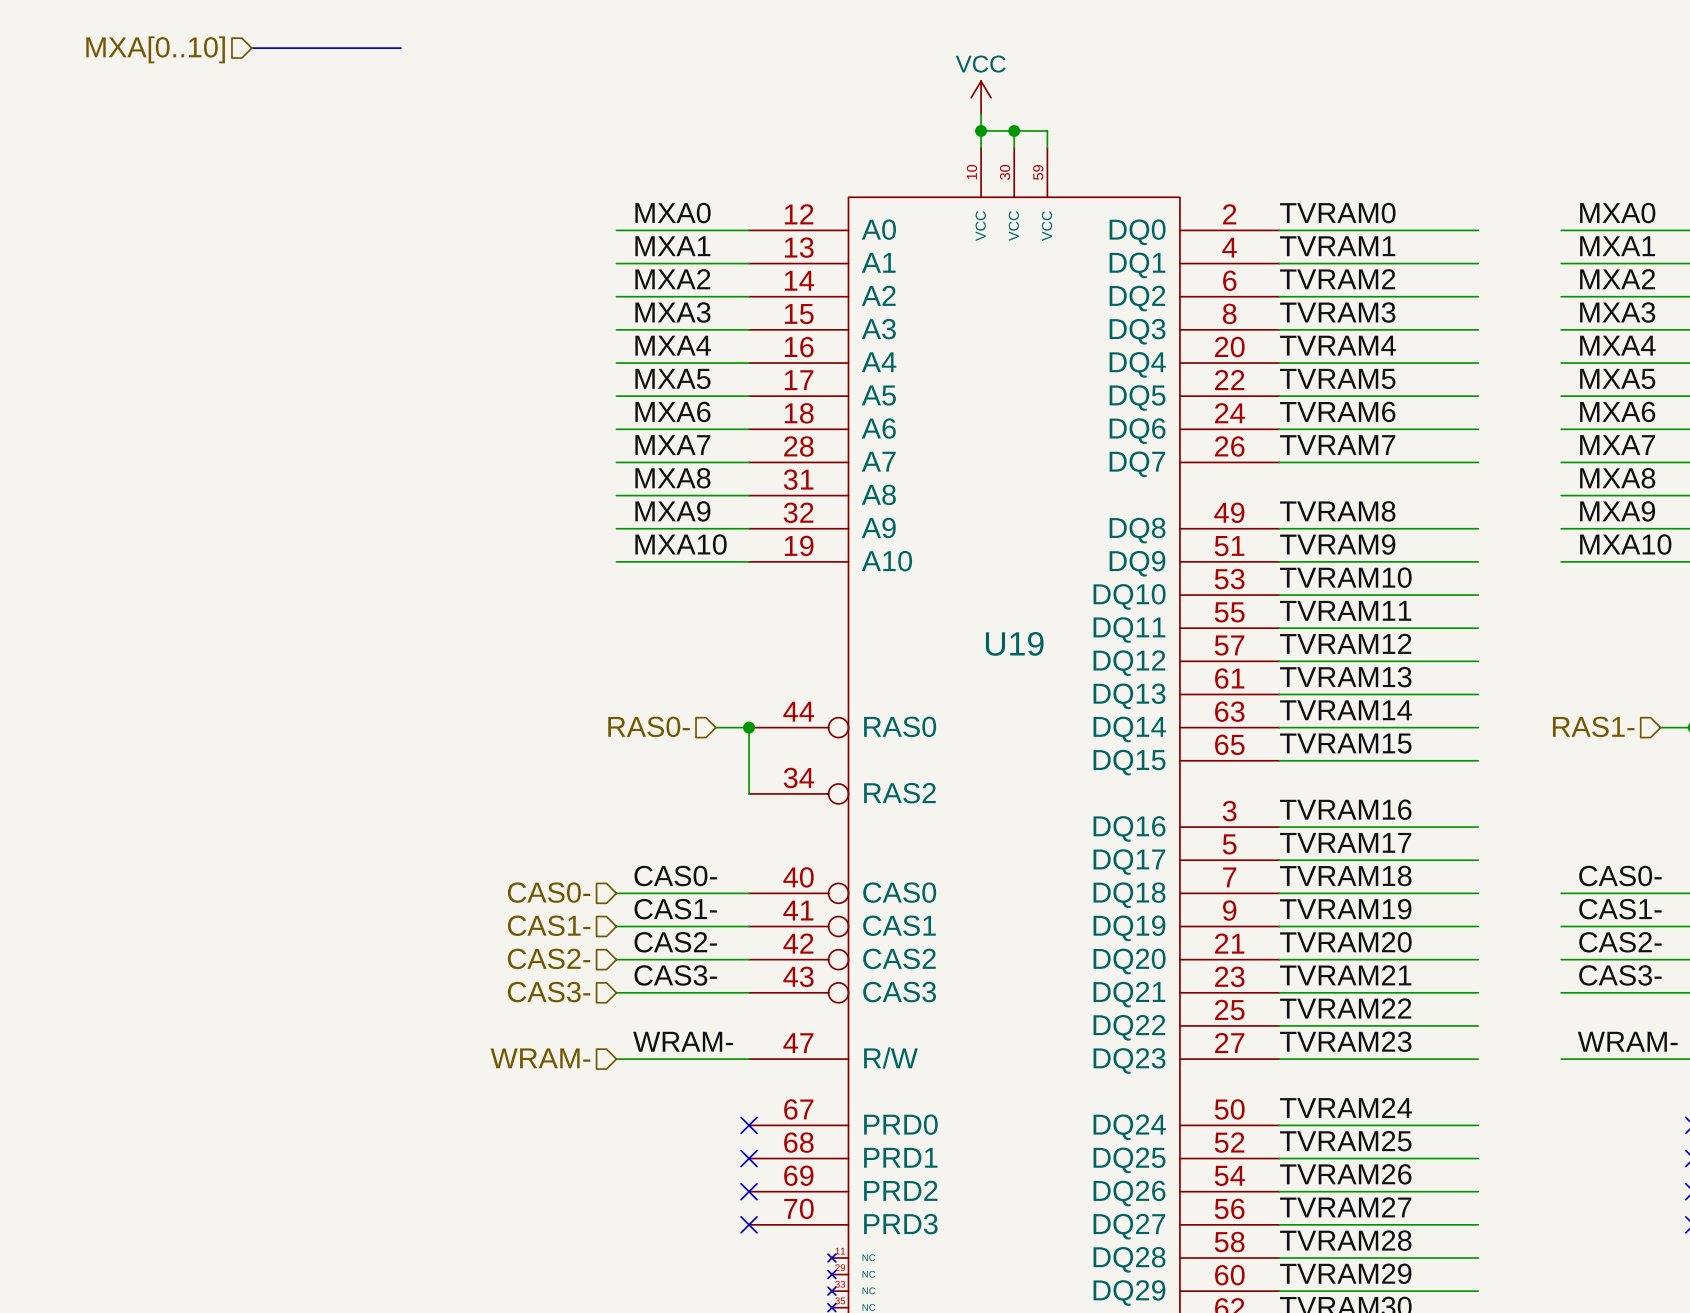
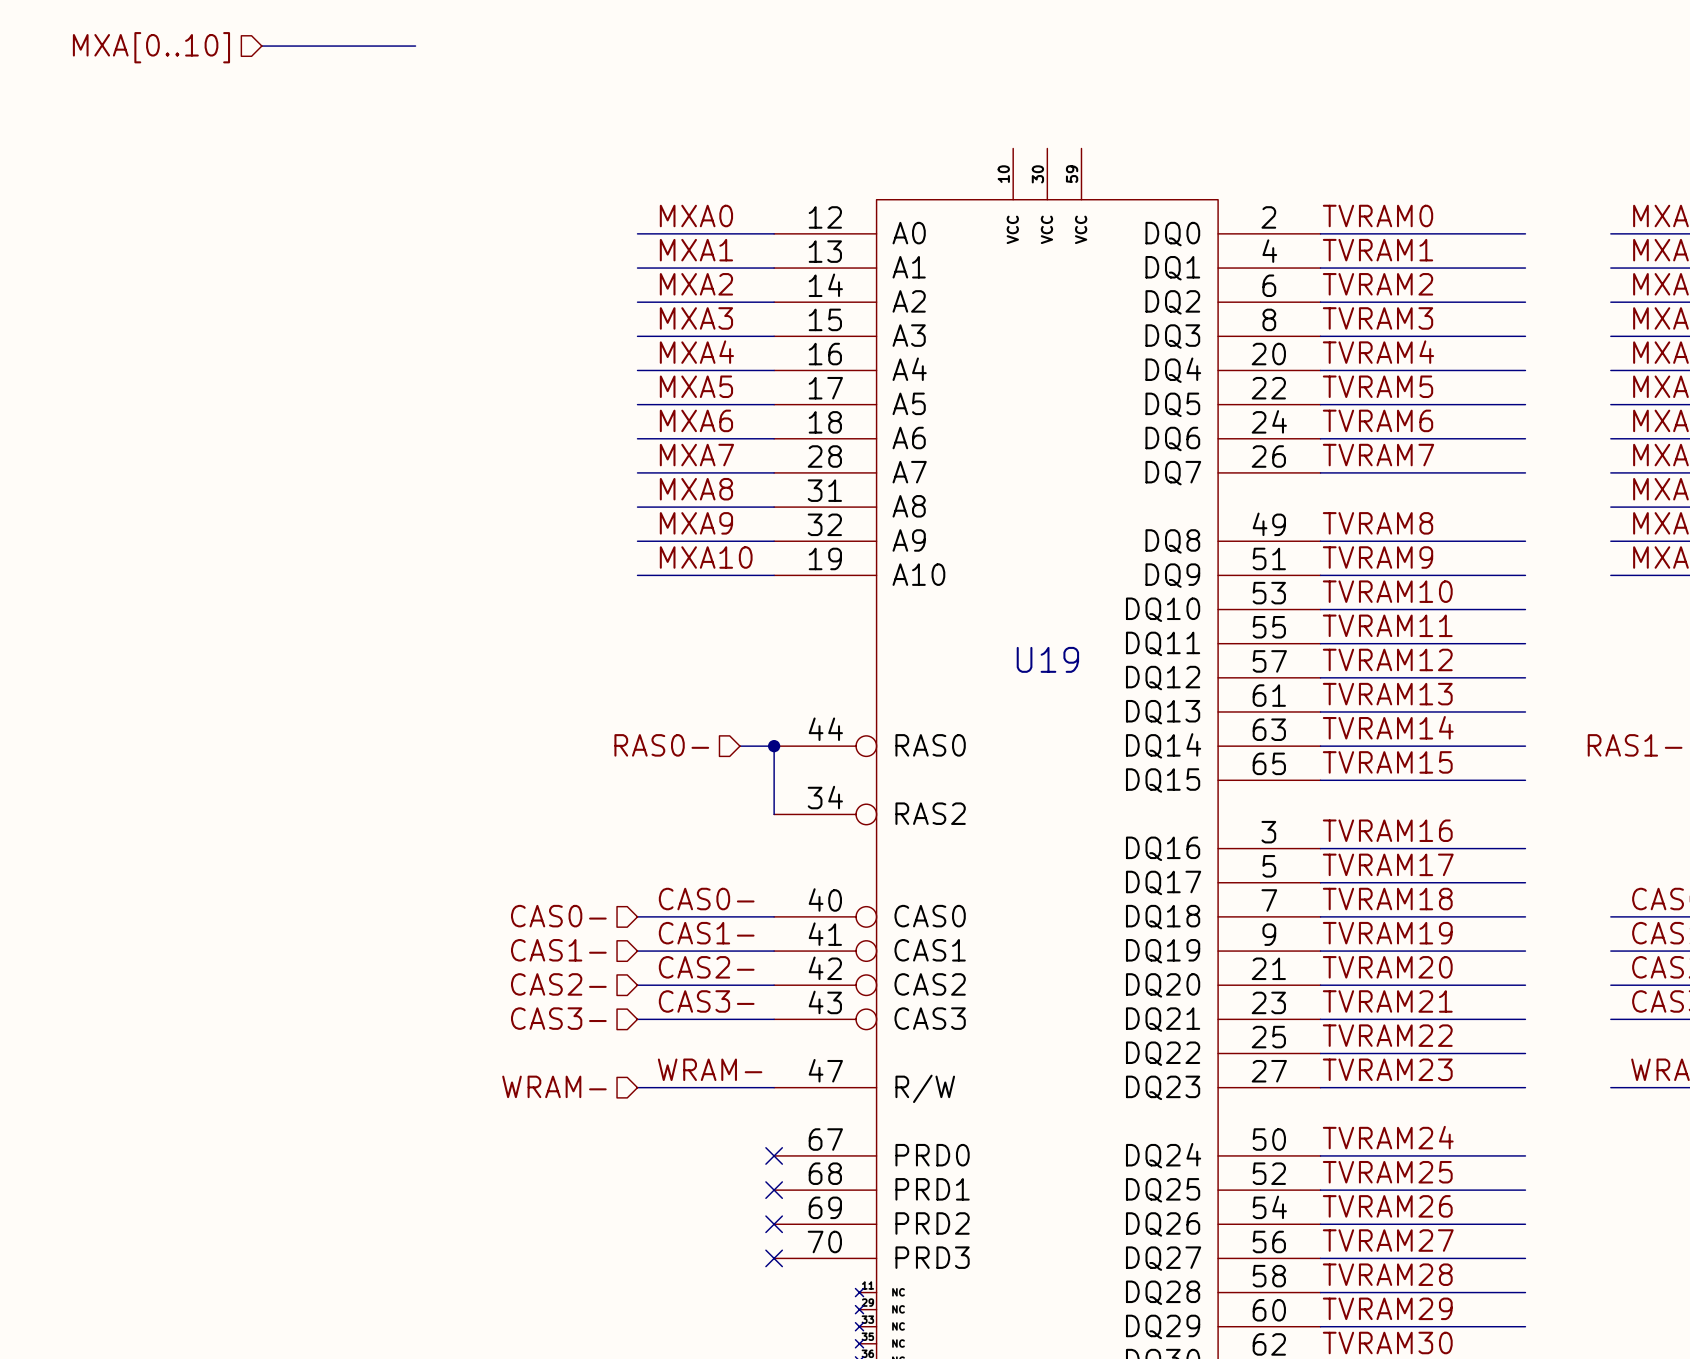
power symbol: VCC (981, 97) -> none
wire: (981, 114) (981, 147) -> none
wire: (981, 130) (1047, 130) (1047, 147) -> none
junction: (981, 130) -> none
wire: (1014, 130) (1014, 147) -> none
junction: (1014, 130) -> none

